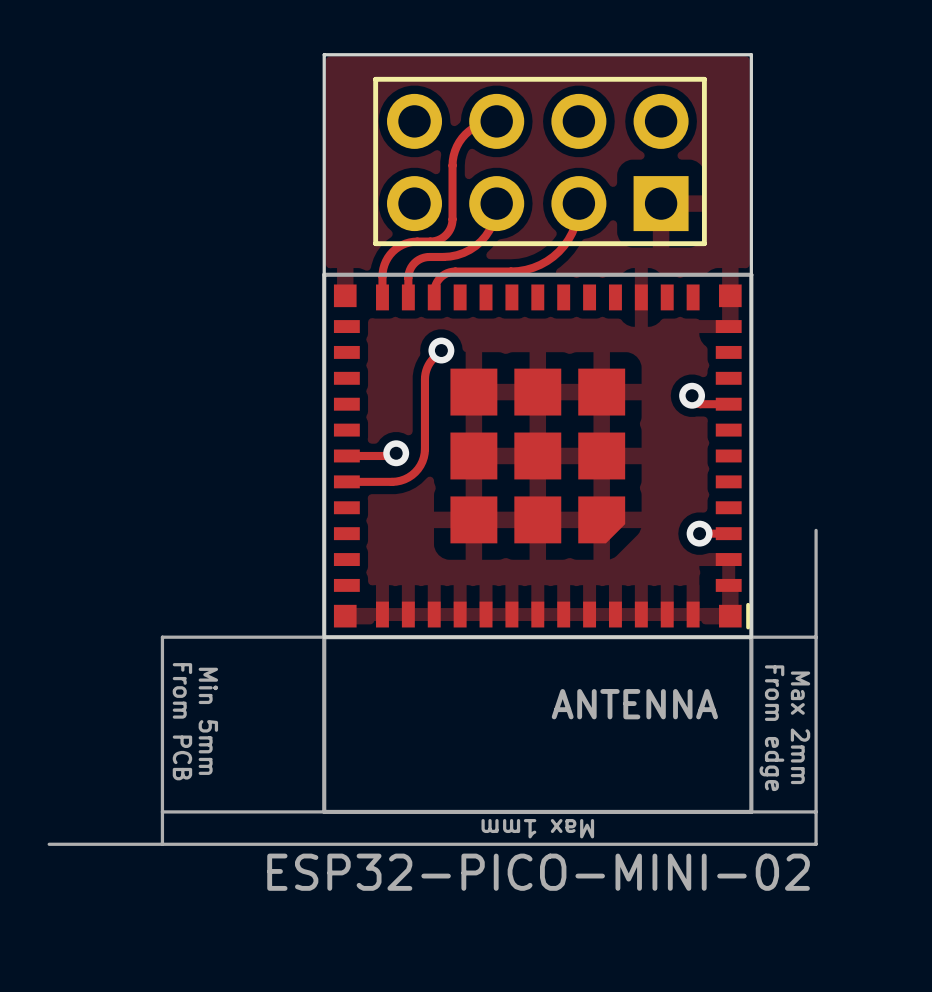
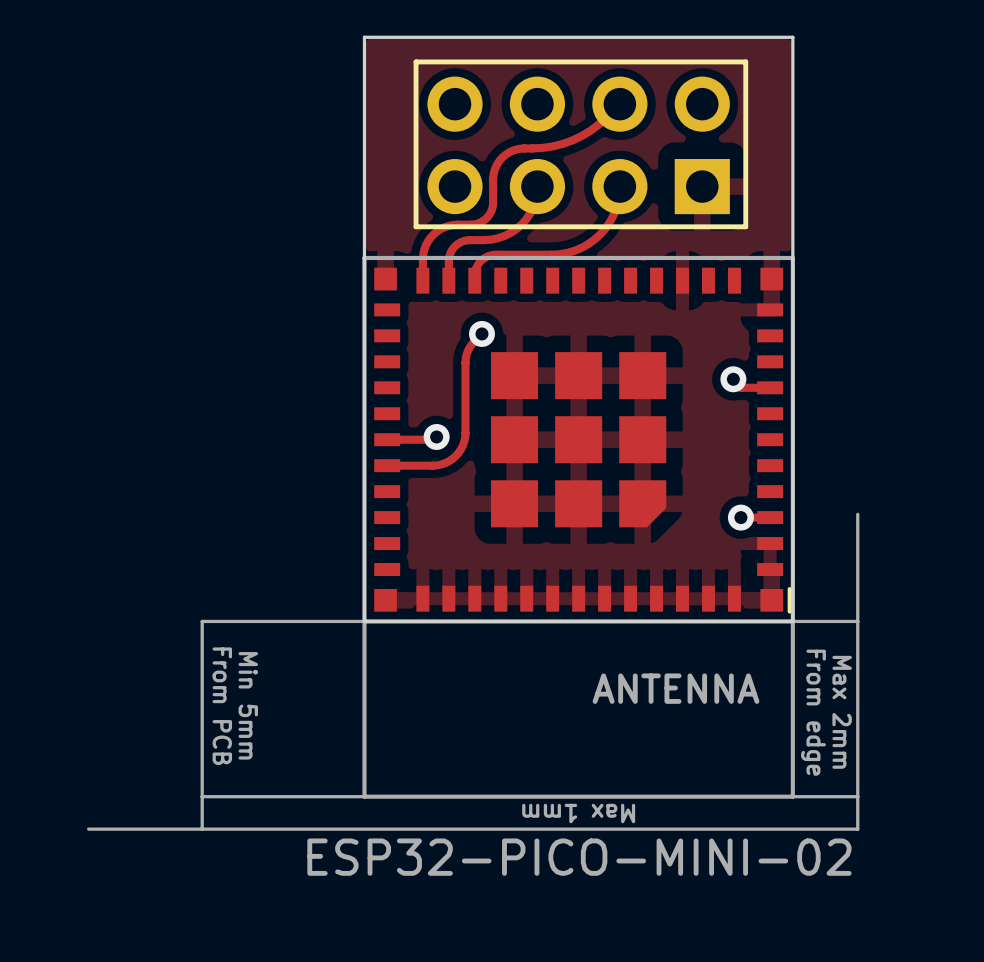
track: (496, 121) (486, 122) (473, 128) (459, 142) (452, 160) (452, 196) -> (619, 104) (598, 124) (572, 140) (552, 146) (517, 149) (507, 153) (497, 163) (493, 179)

